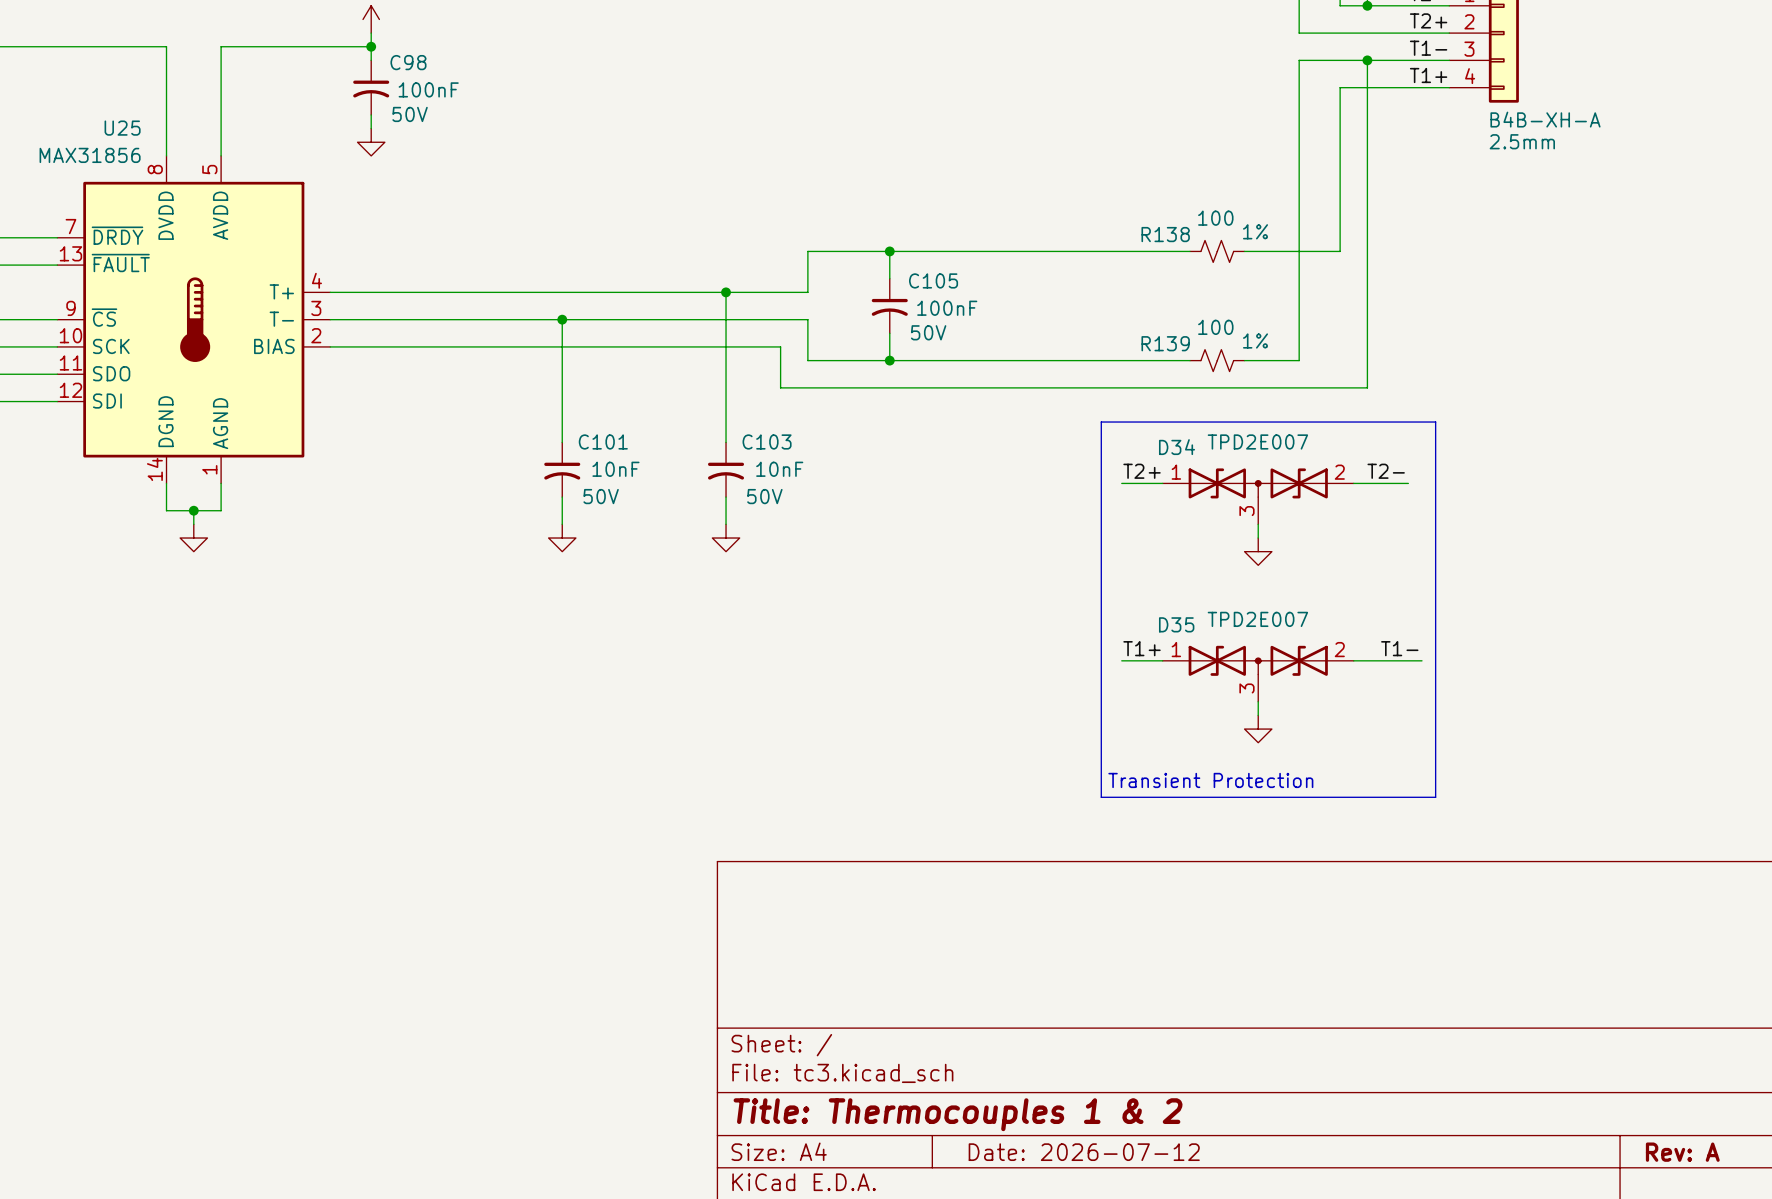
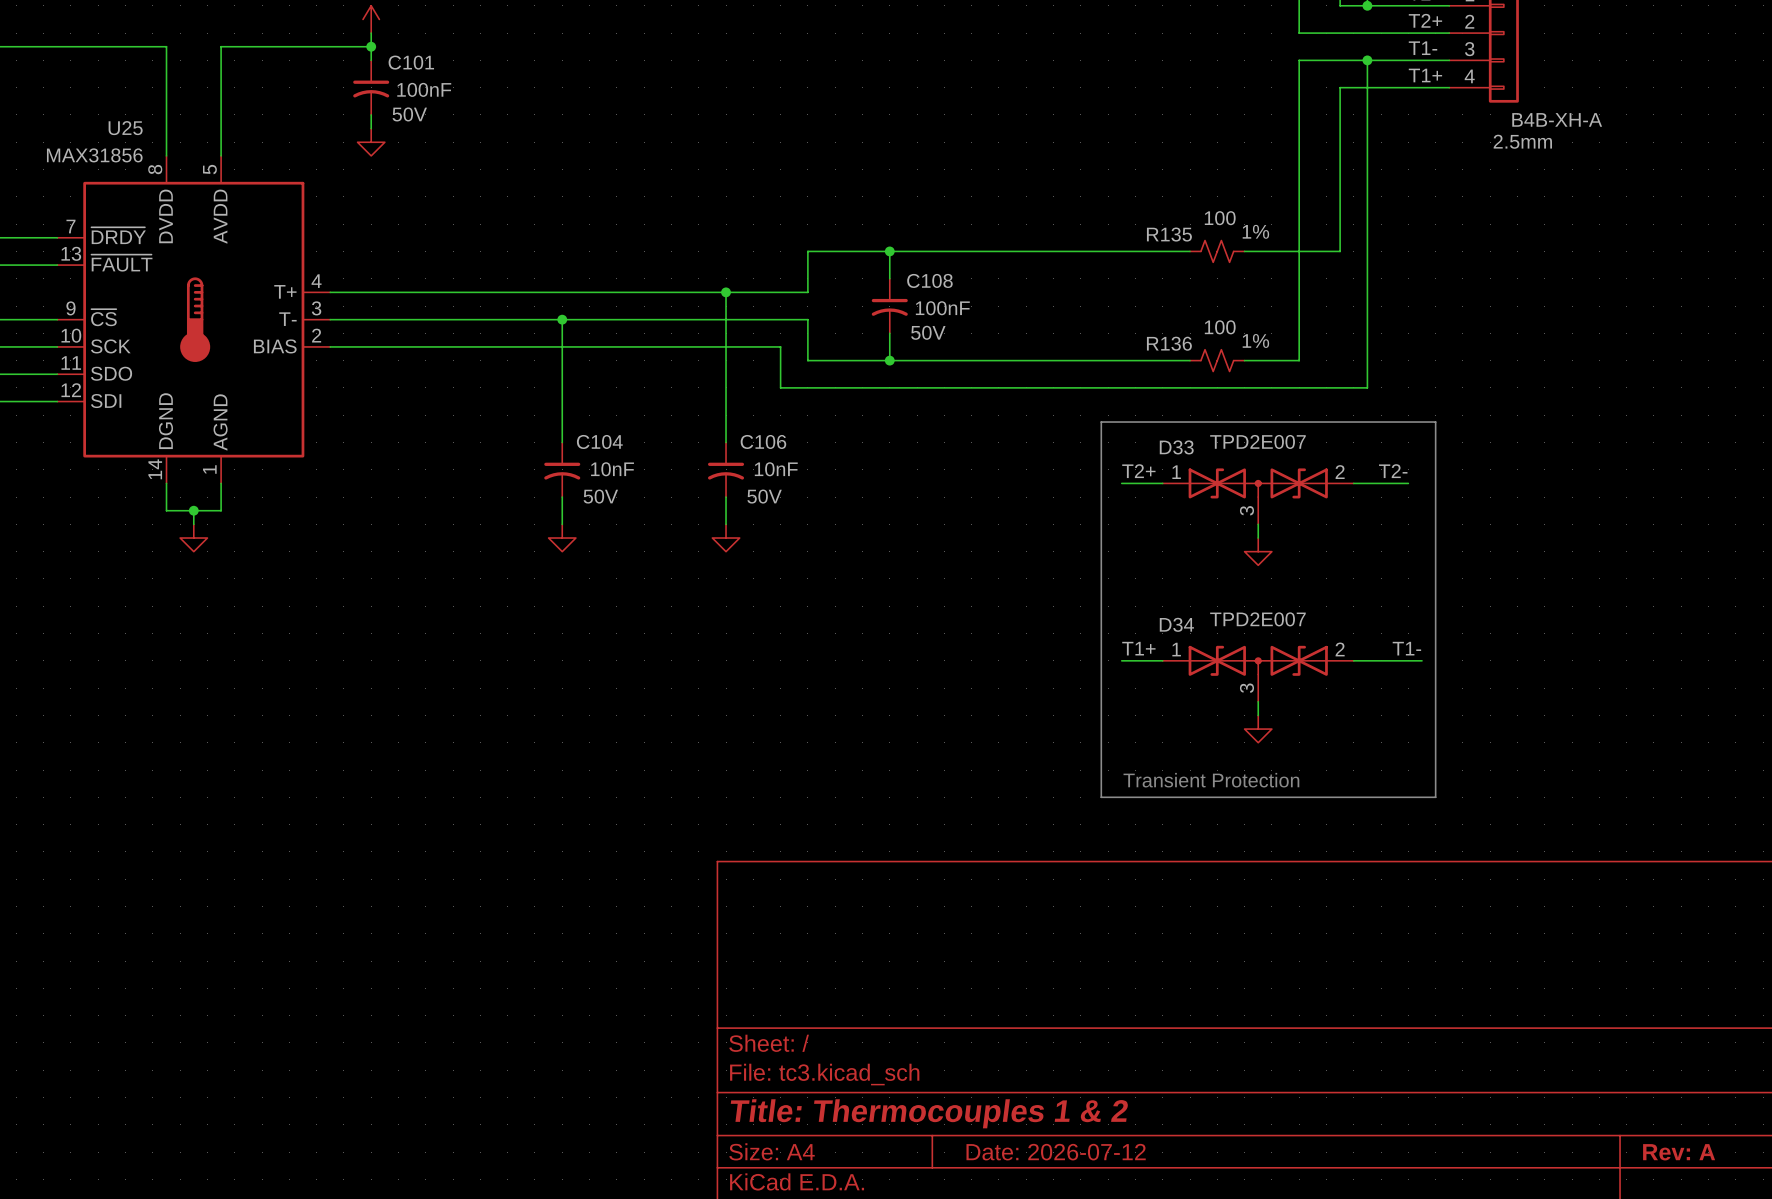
C98 name: C98 (408, 62) -> C101 (411, 62)
R138 name: R138 (1165, 234) -> R135 (1169, 234)
C105 name: C105 (933, 280) -> C108 (929, 280)
R139 name: R139 (1165, 343) -> R136 (1169, 343)
C101 name: C101 (603, 441) -> C104 (599, 441)
C103 name: C103 (767, 441) -> C106 (763, 441)
D34 name: D34 (1177, 447) -> D33 (1176, 447)
D35 name: D35 (1176, 624) -> D34 (1176, 624)

